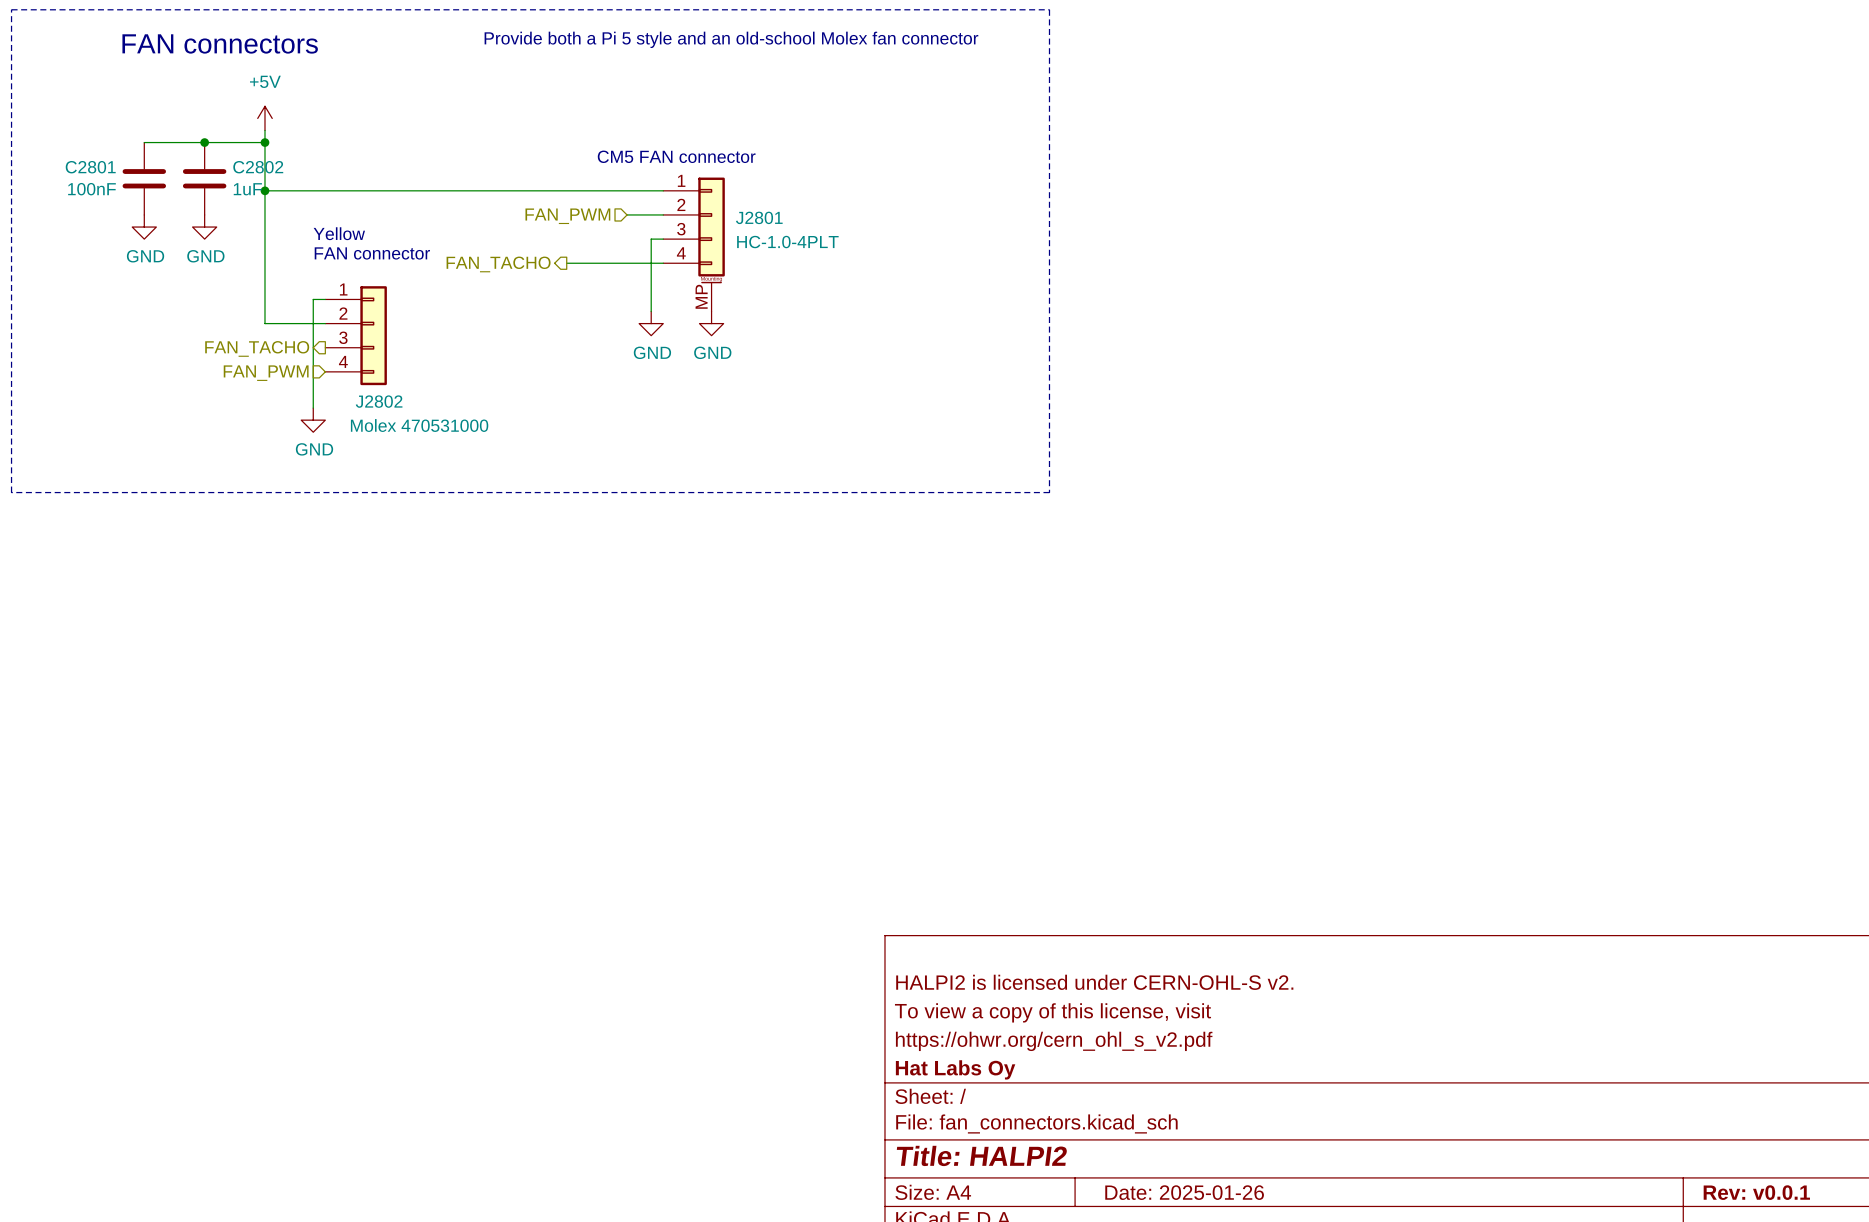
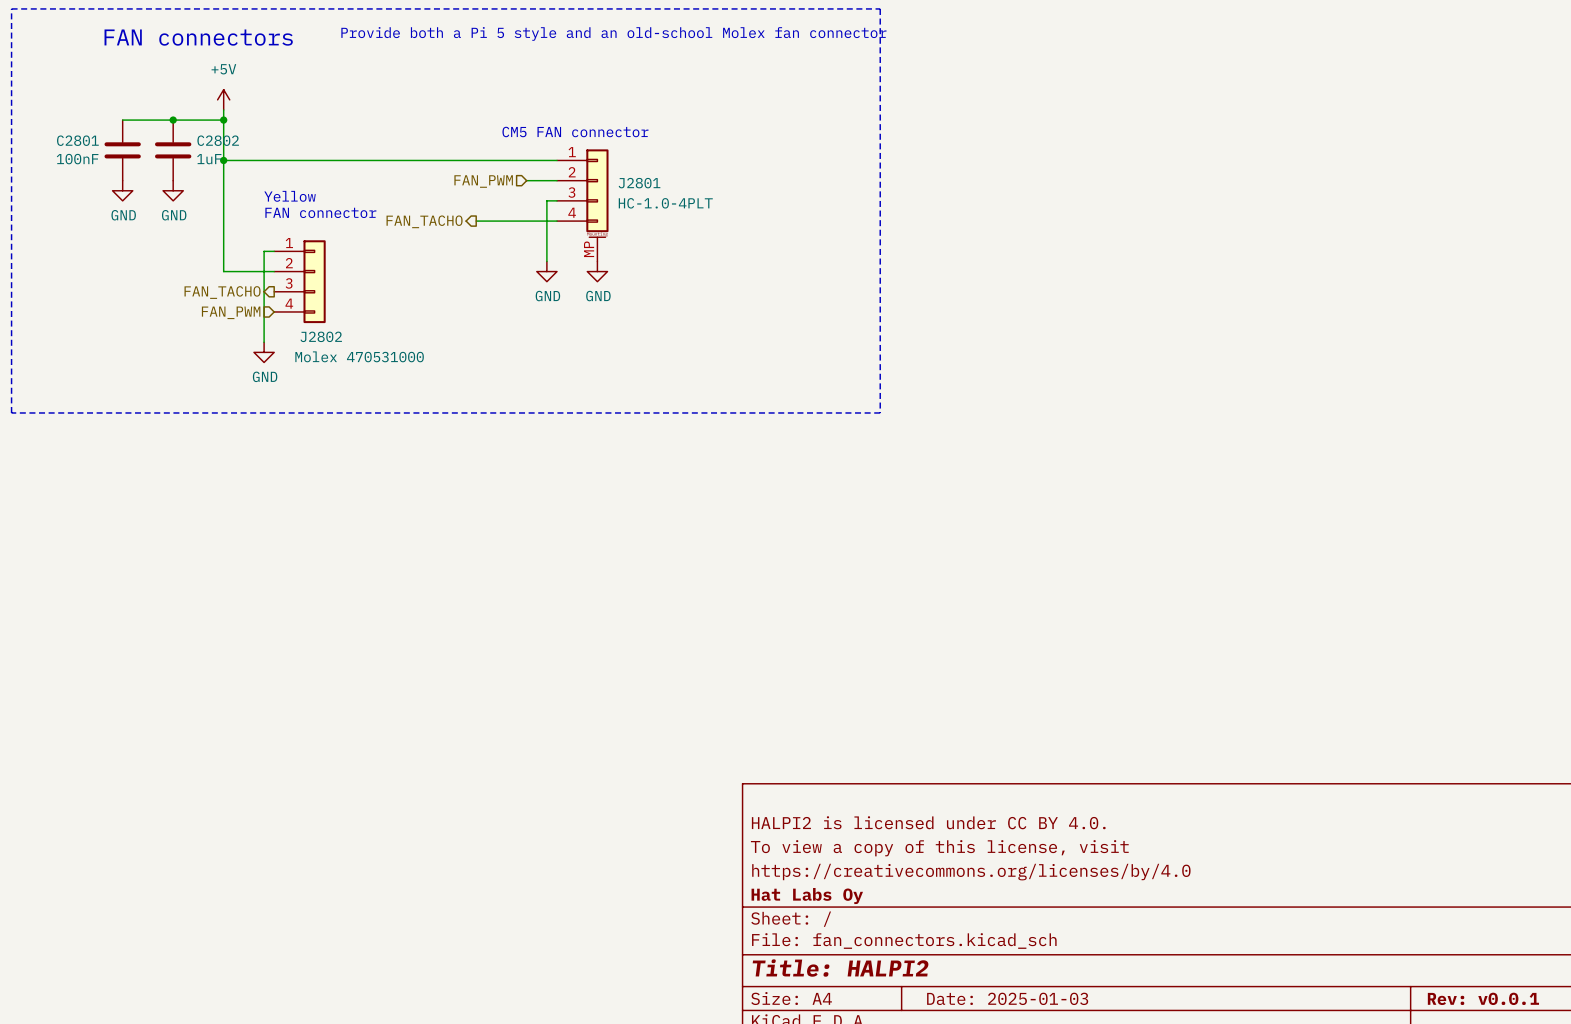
title block: HALPI2 is licensed under CERN-OHL-S v2. (1094, 982) -> HALPI2 is licensed under CC BY 4.0. (928, 822)
title block: https://ohwr.org/cern_ohl_s_v2.pdf (1054, 1041) -> https://creativecommons.org/licenses/by/4.0 (971, 872)
title block: Date: 2025-01-26 (1184, 1192) -> Date: 2025-01-03 (1007, 998)

